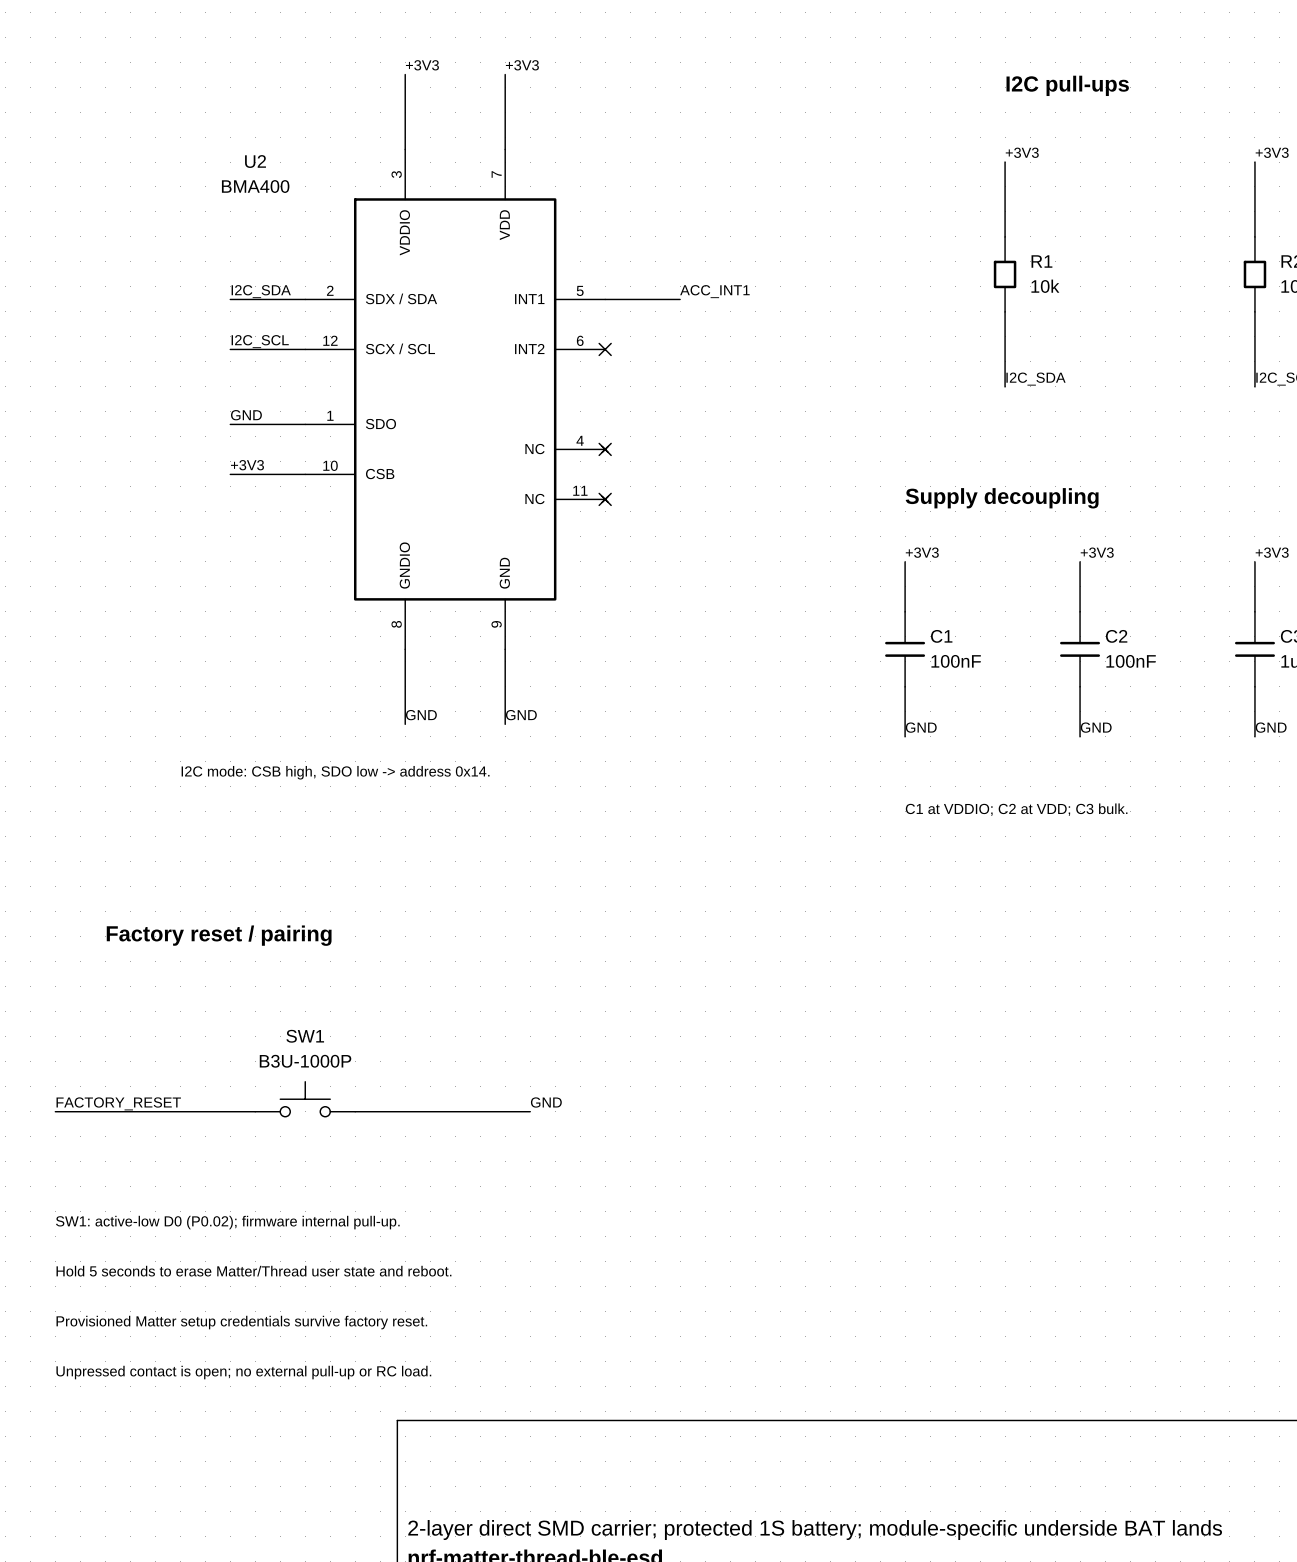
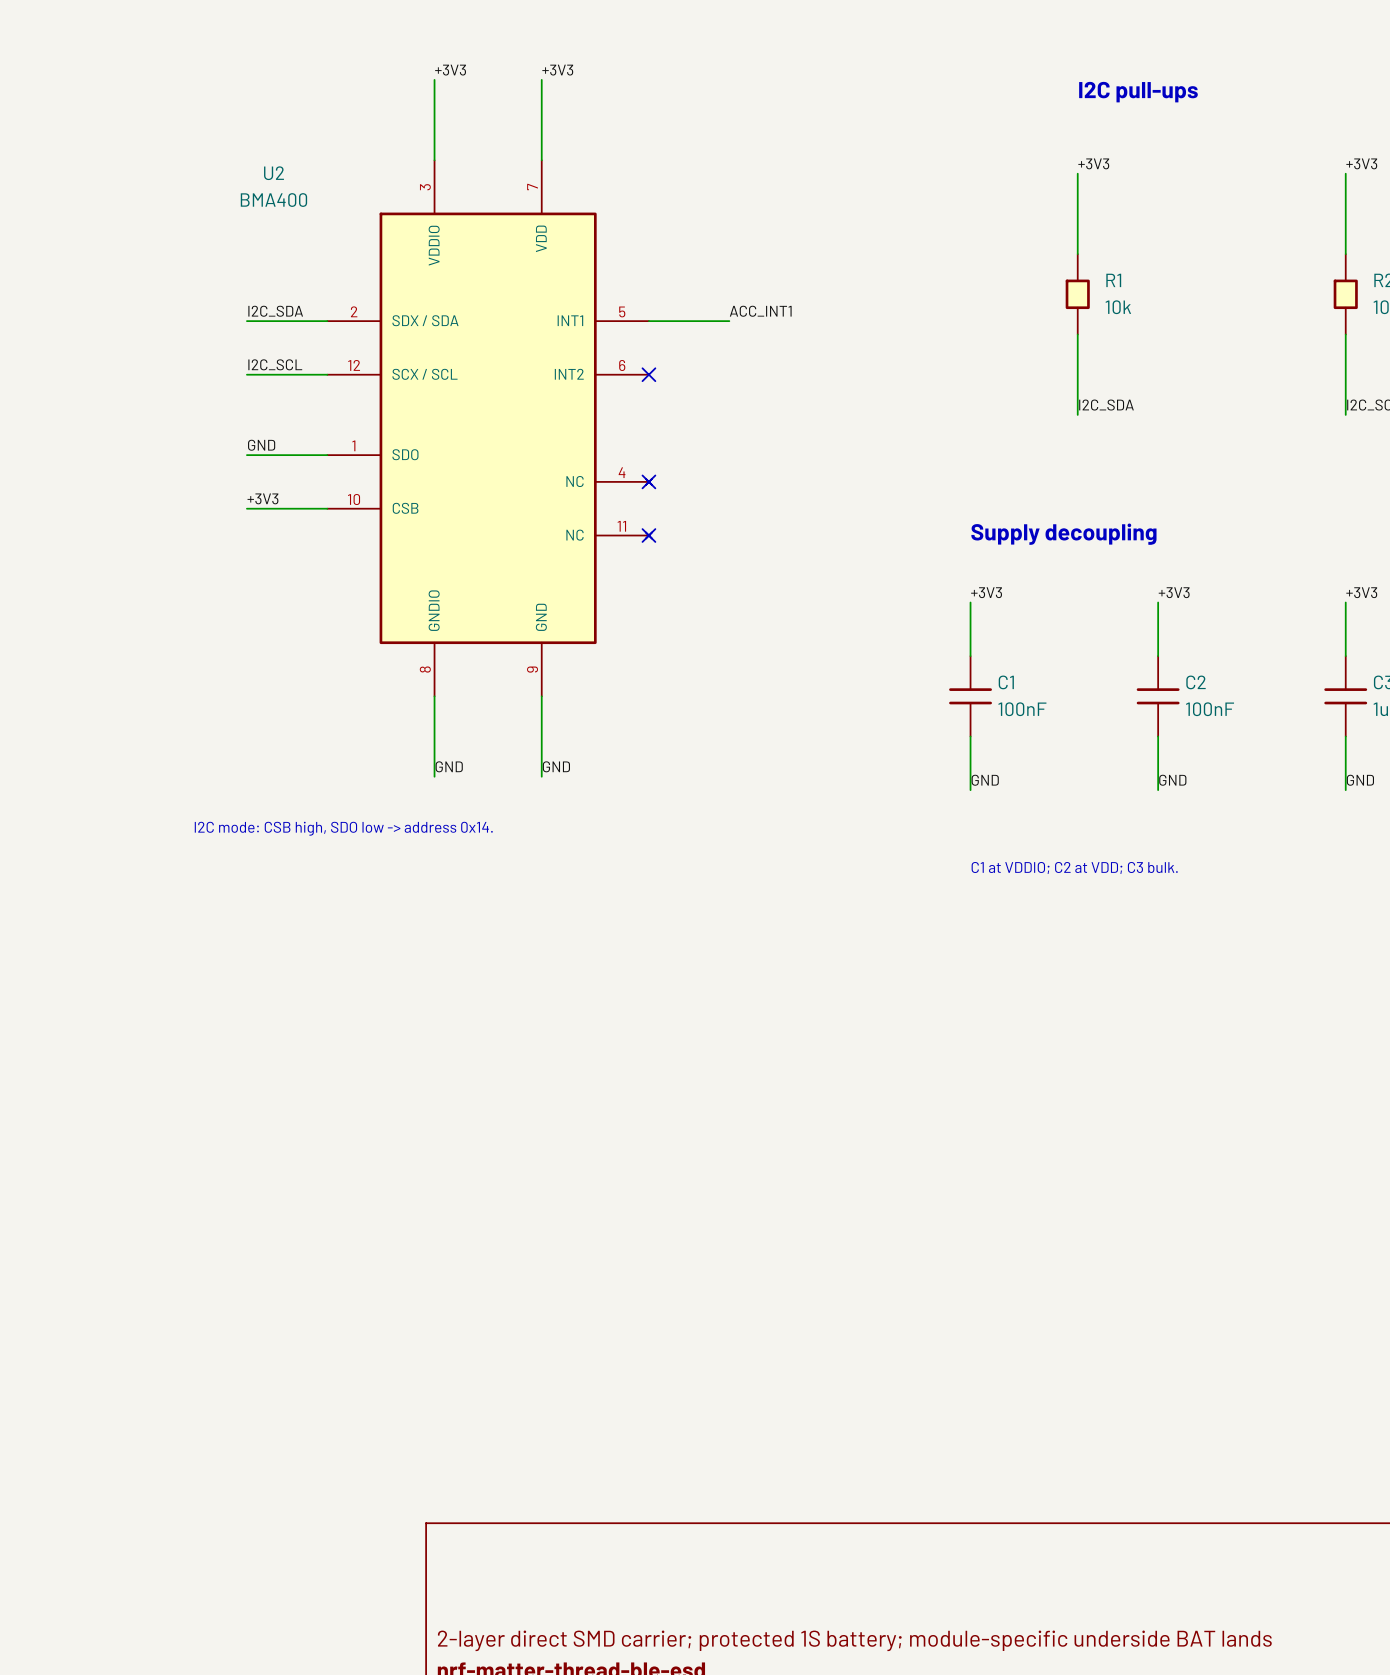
text: Factory reset / pairing (219, 935) -> none
SW1: B3U-1000P (305, 1099) -> none
label: GND (546, 1102) -> none
label: FACTORY_RESET (118, 1103) -> none
wire: (55, 1111) (255, 1111) -> none
wire: (355, 1111) (530, 1111) -> none
text: SW1: active-low D0 (P0.02); firmware internal pull-up. (227, 1222) -> none
text: Hold 5 seconds to erase Matter/Thread user state and reboot. (253, 1271) -> none
text: Provisioned Matter setup credentials survive factory reset. (241, 1322) -> none
text: Unpressed contact is open; no external pull-up or RC load. (243, 1372) -> none

